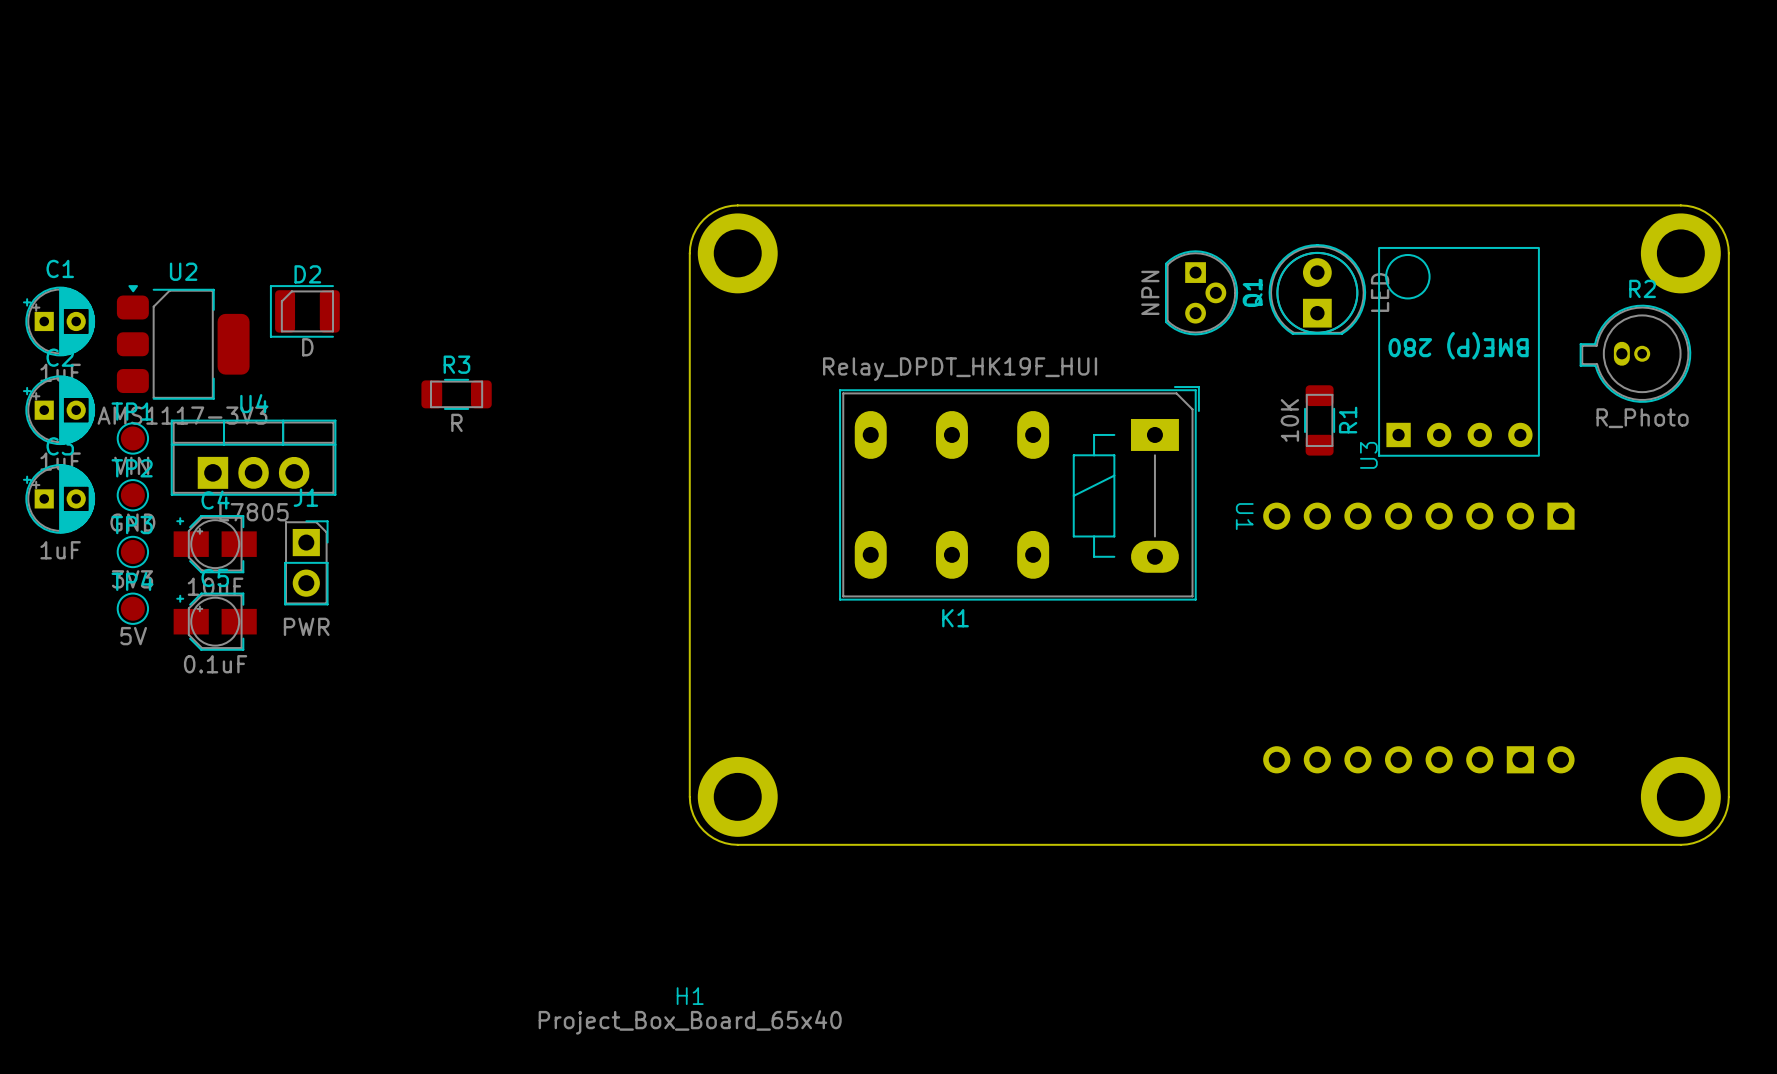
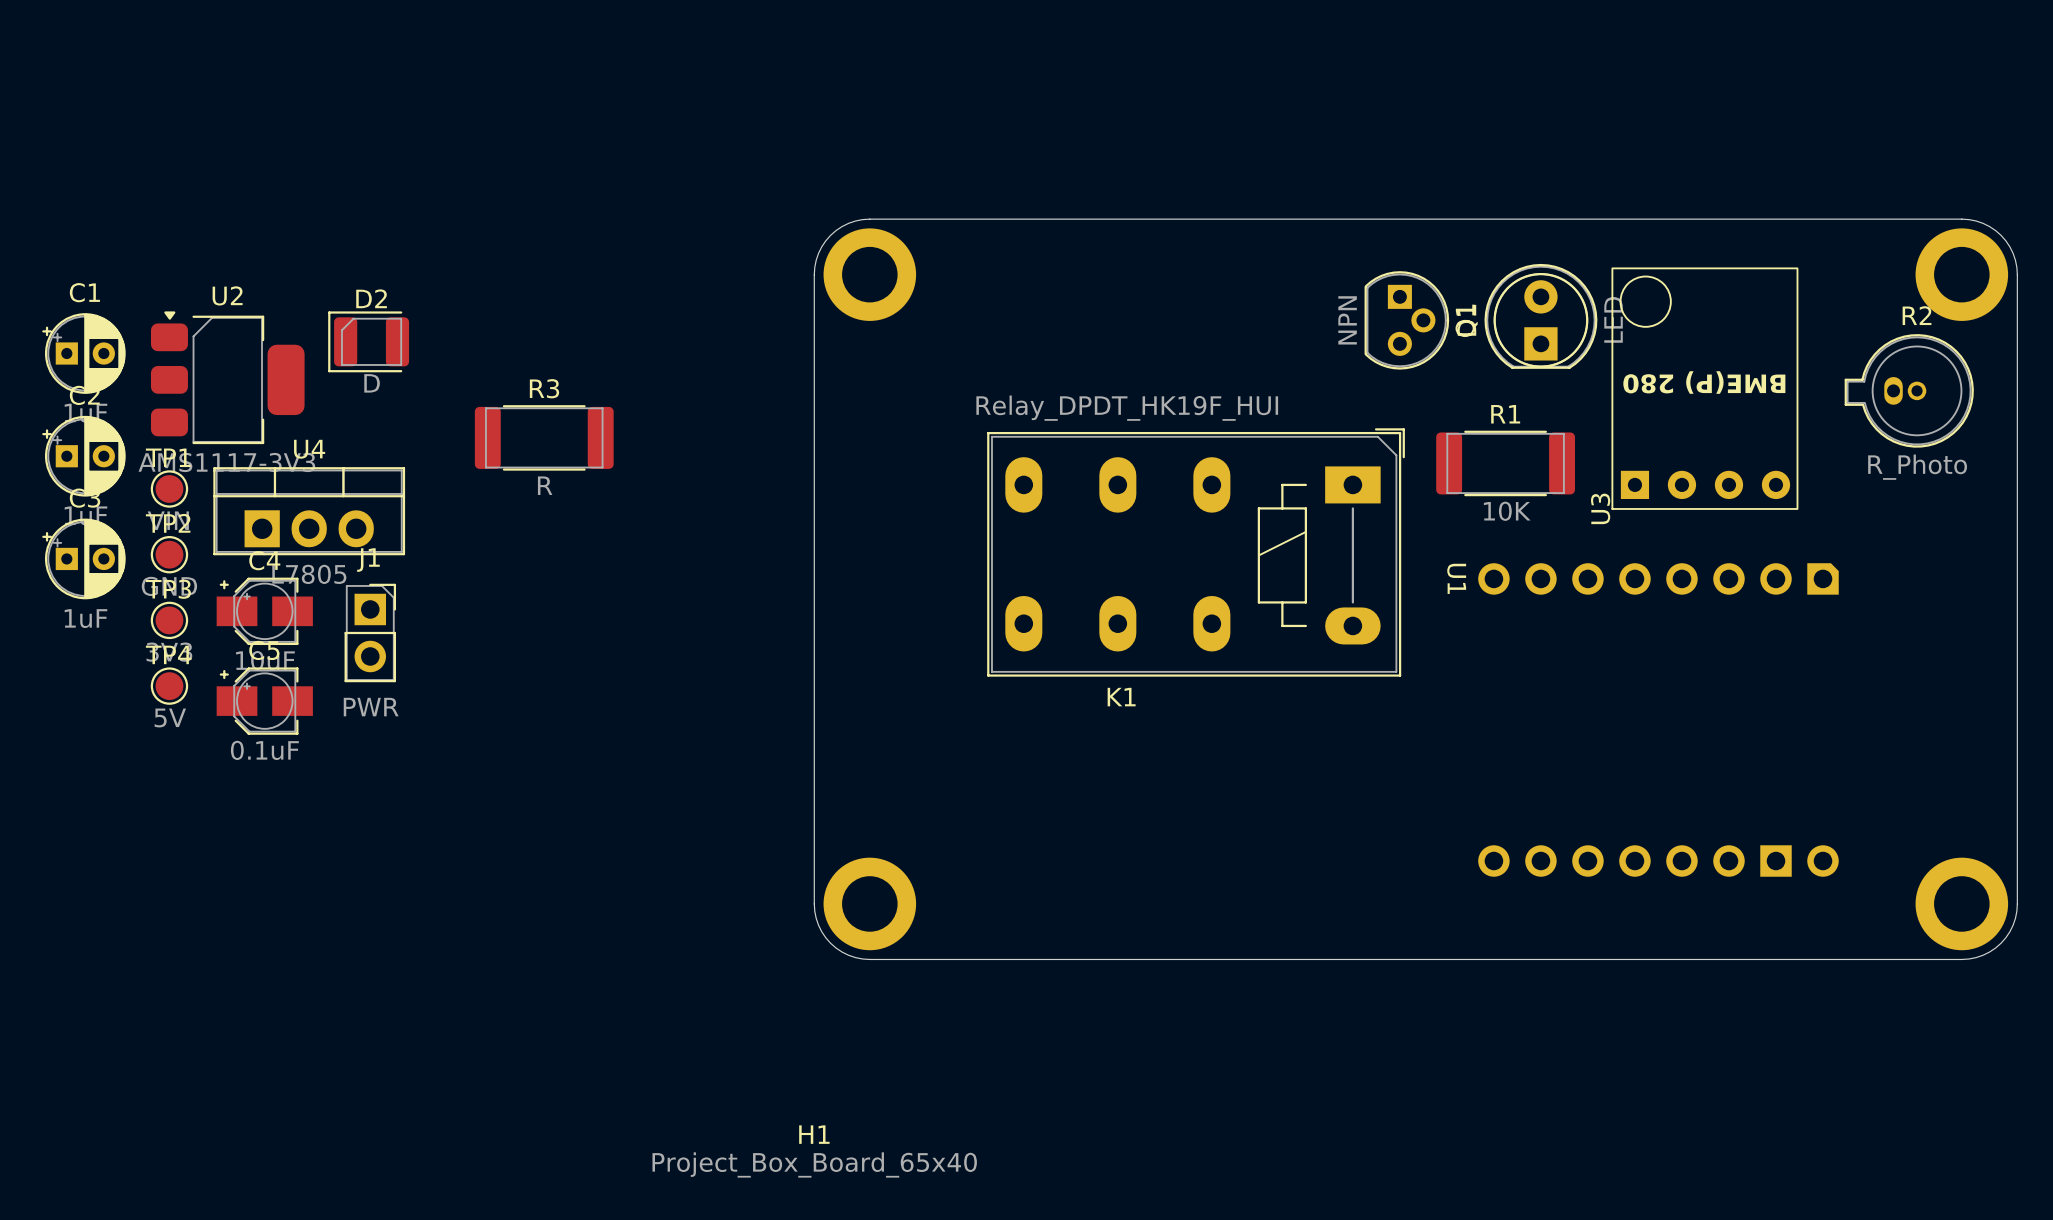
R3 footprint: [421, 378, 492, 410] -> [474, 405, 614, 471]
R1 footprint: [1304, 385, 1336, 456] -> [1436, 430, 1576, 497]
R1 value position: 10K (1289, 420) -> 10K (1507, 511)
R1 name position: R1 (1348, 420) -> R1 (1505, 414)

